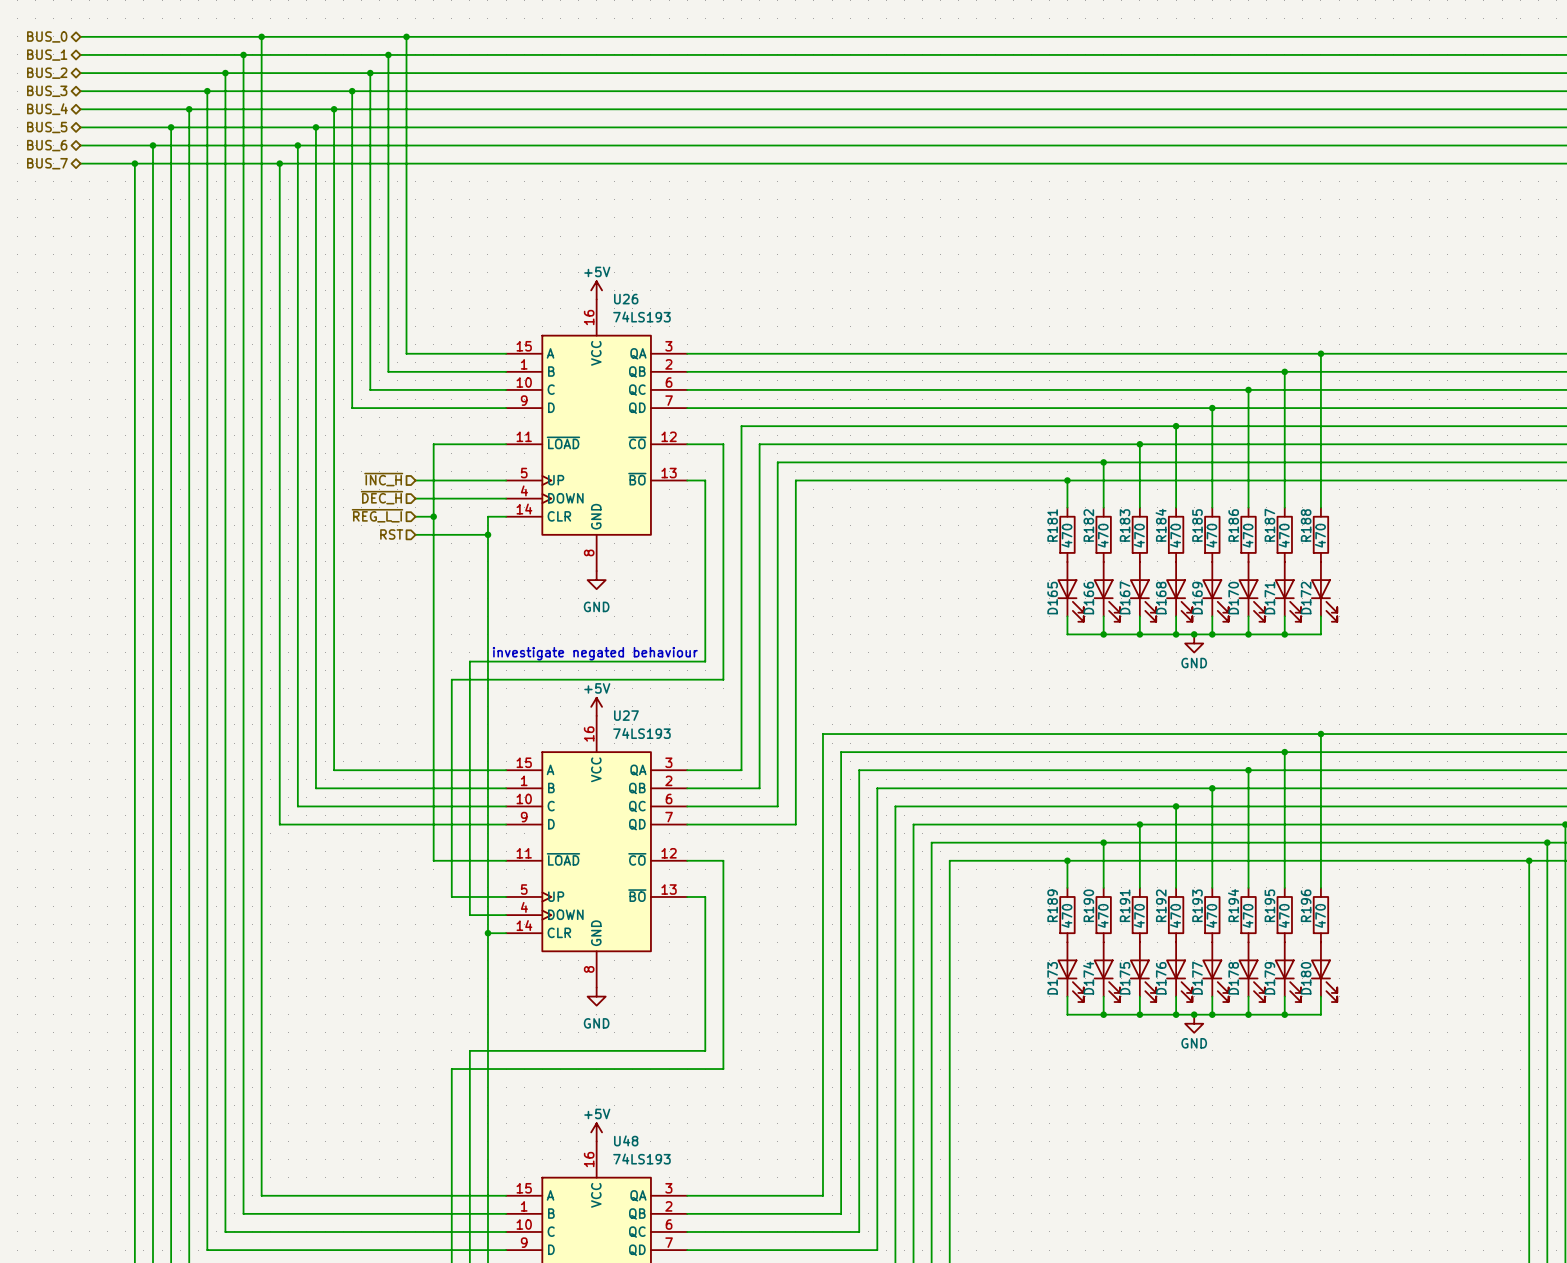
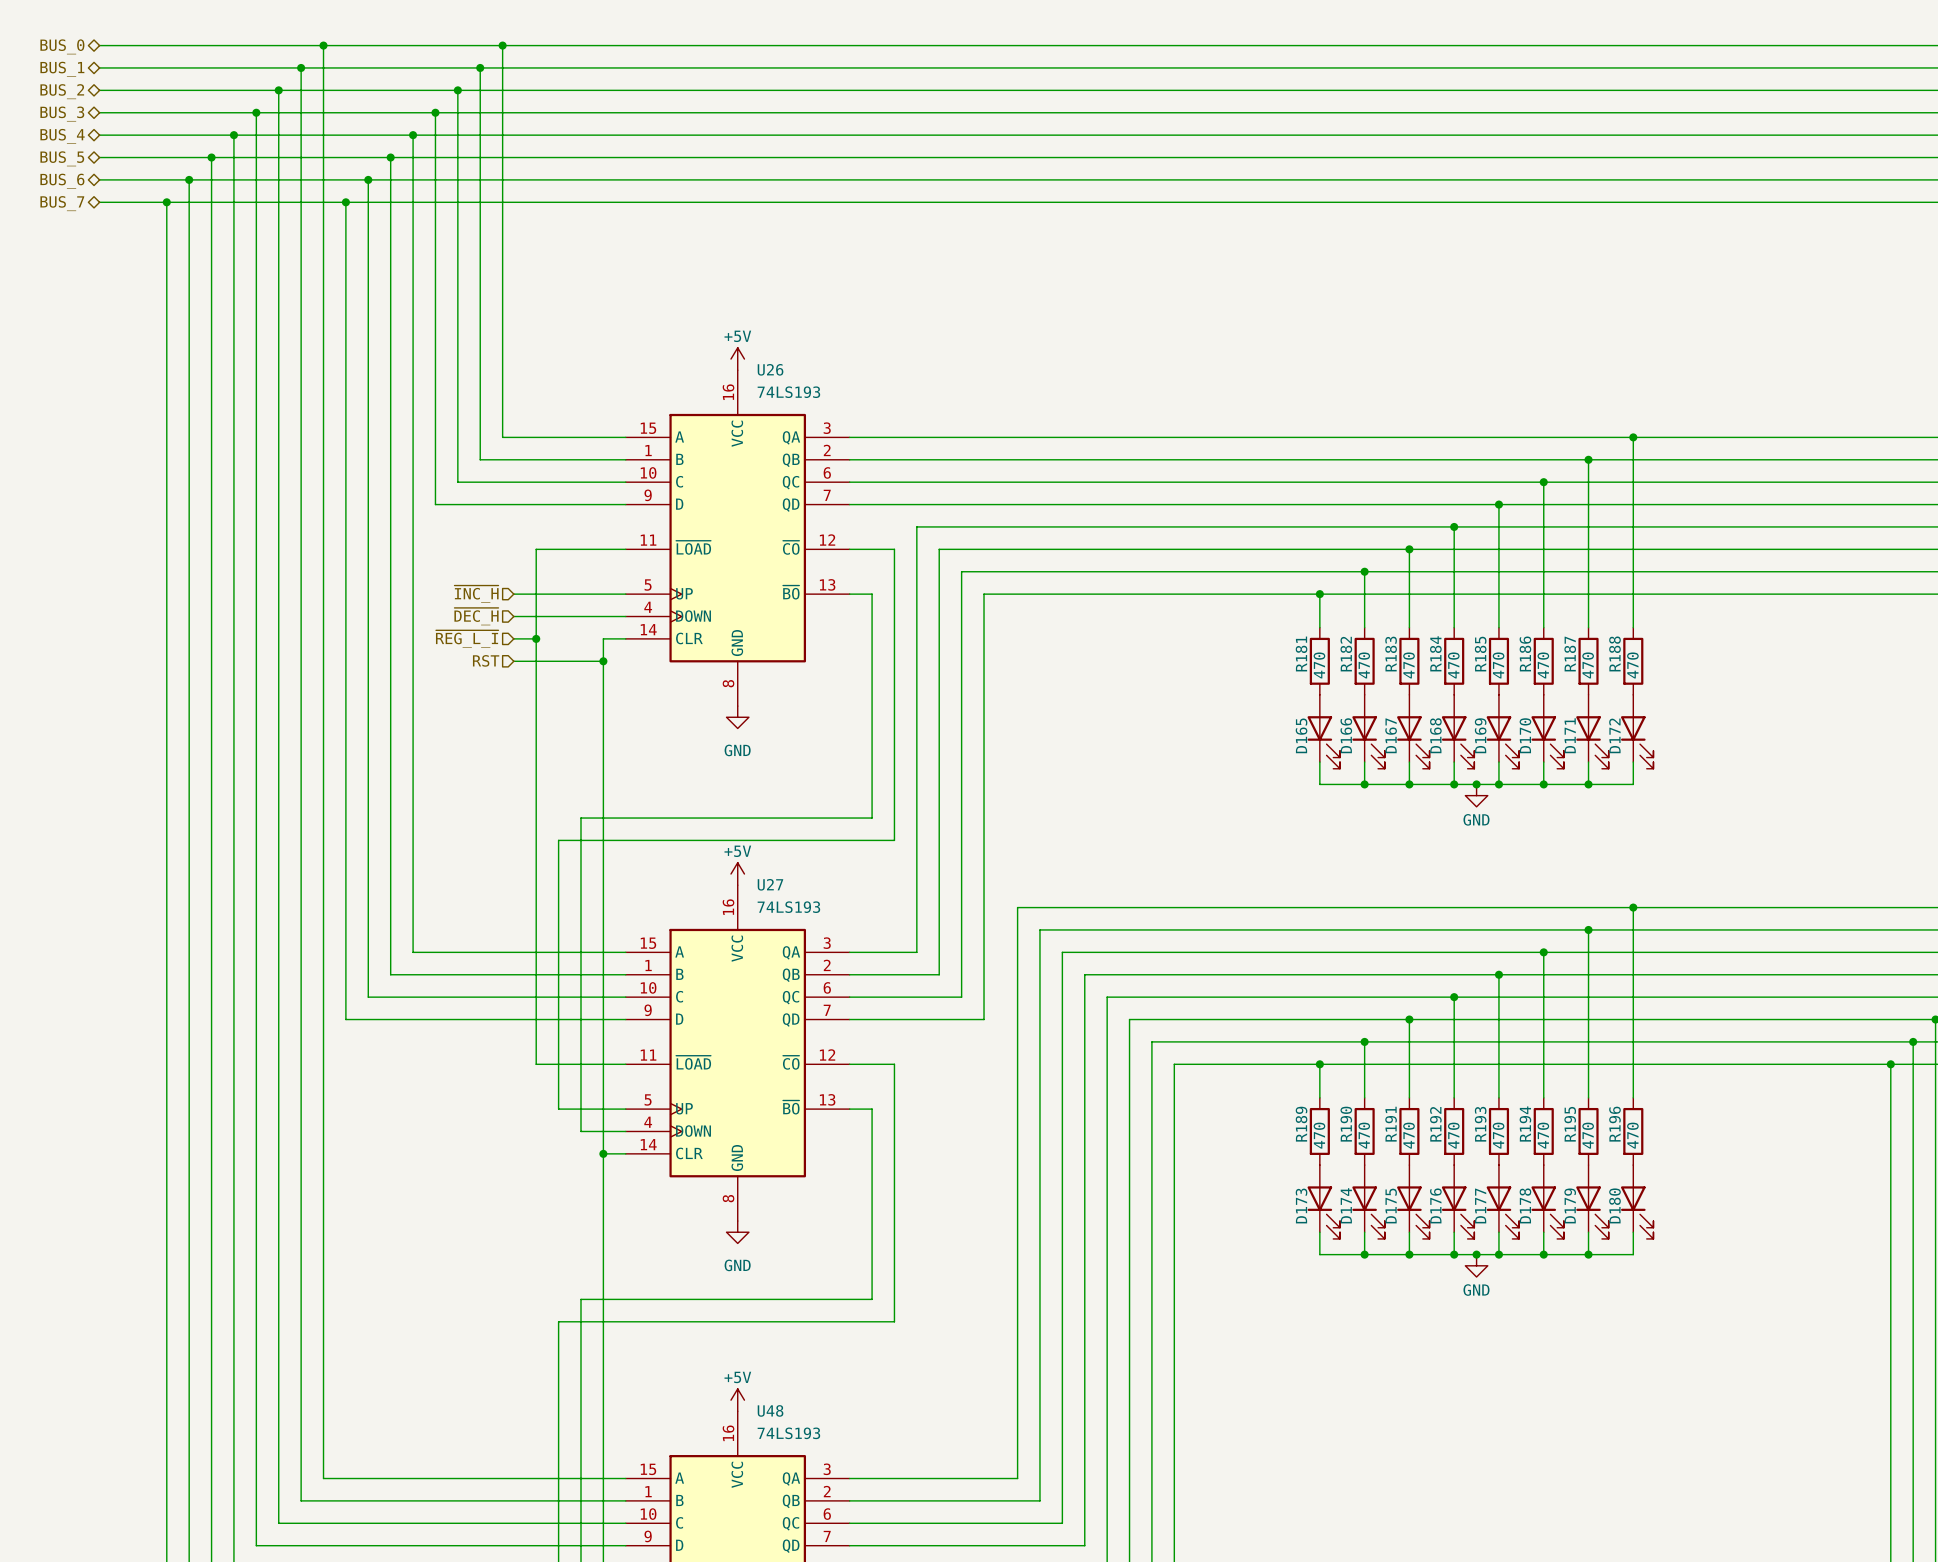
text: investigate negated behaviour (595, 653) -> none

